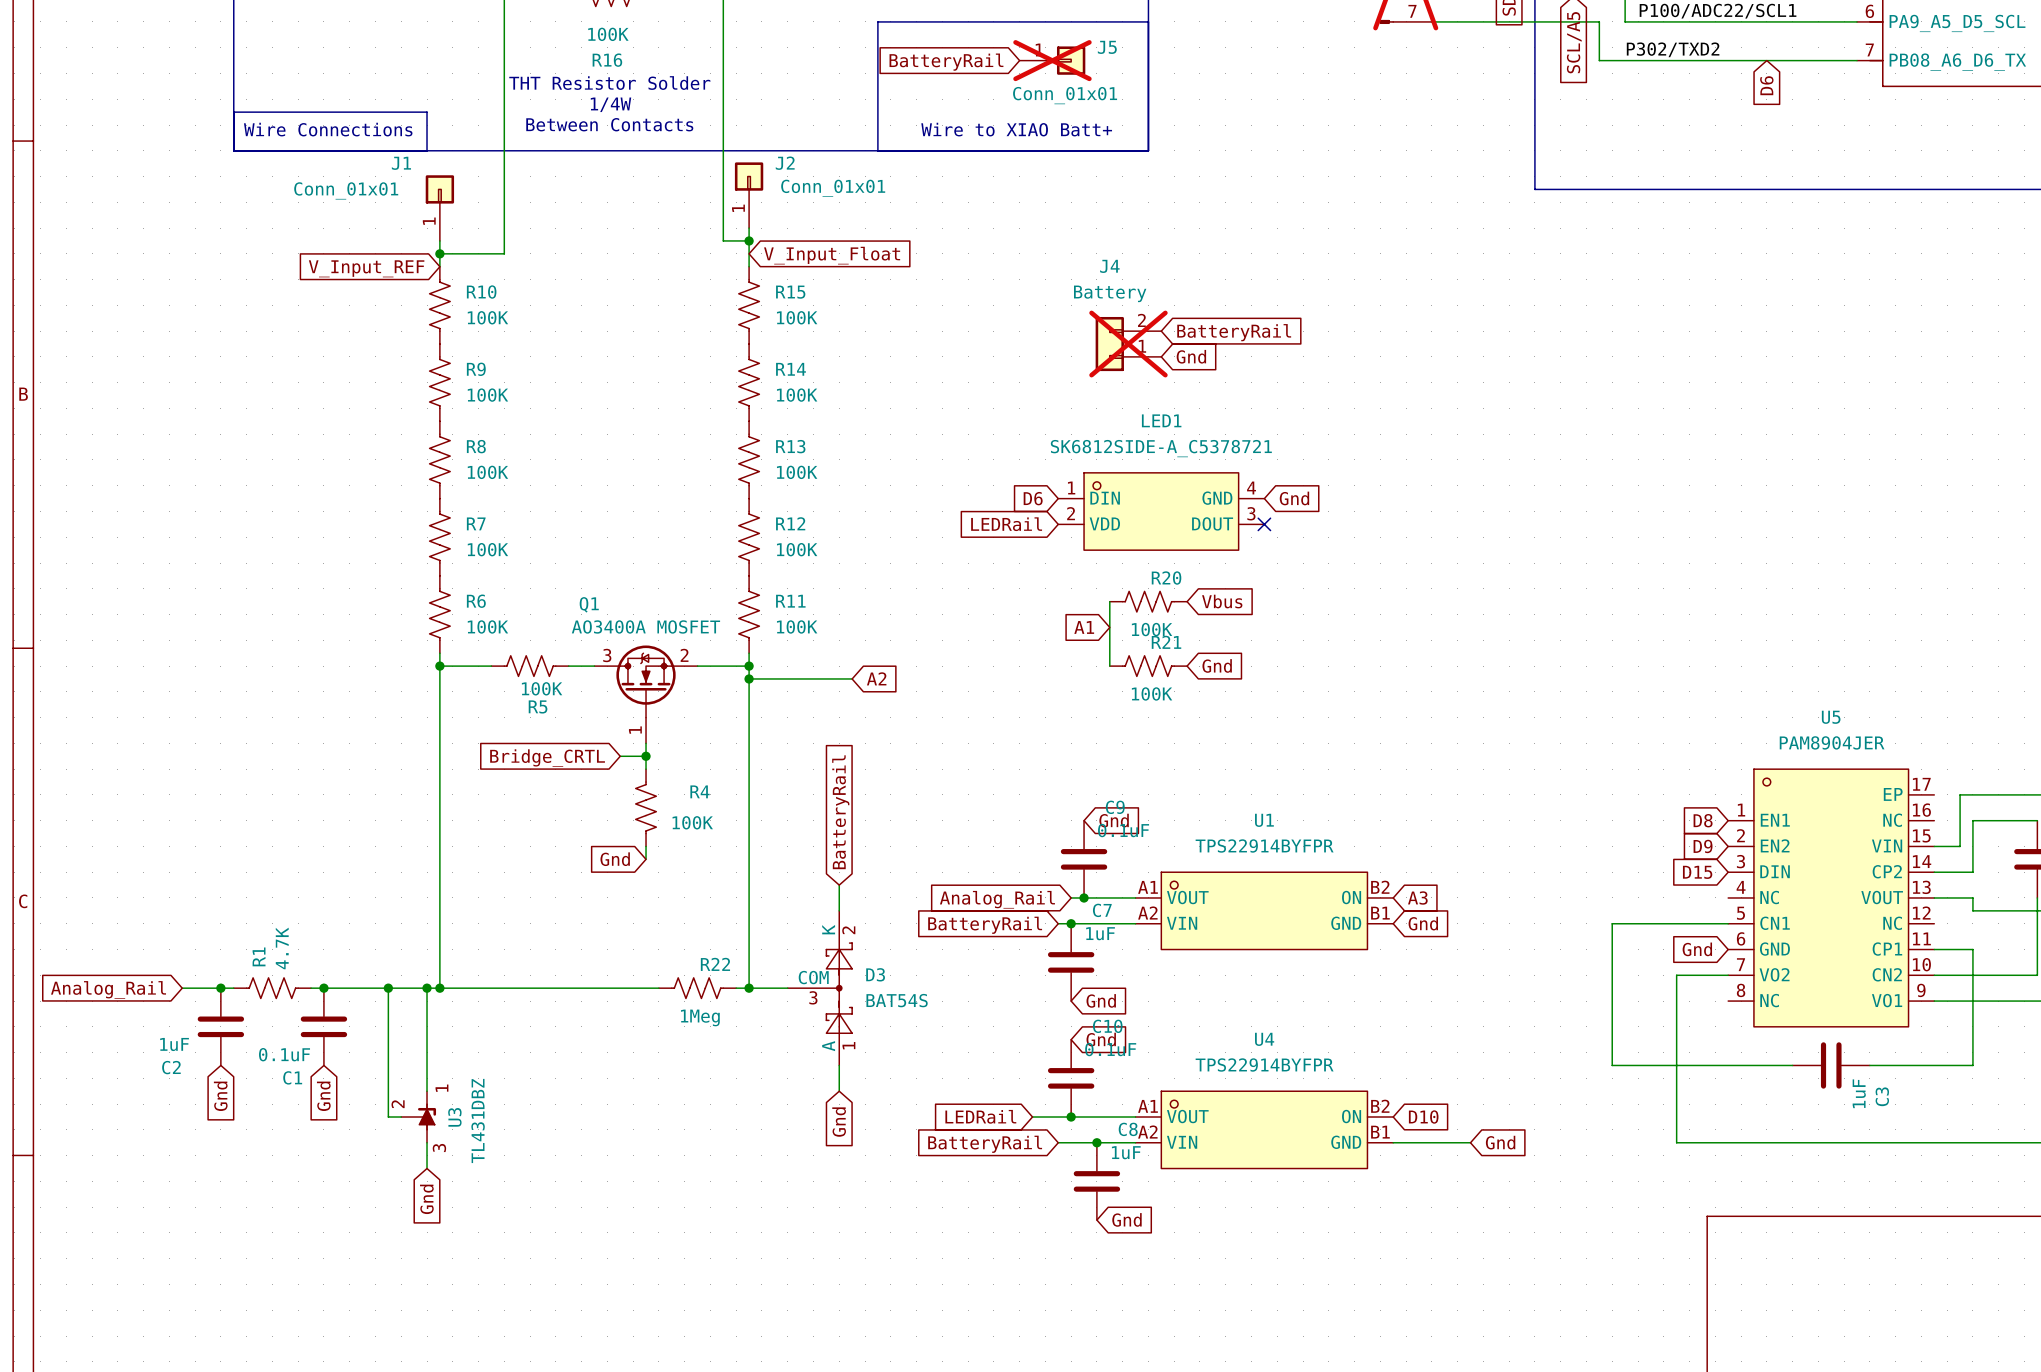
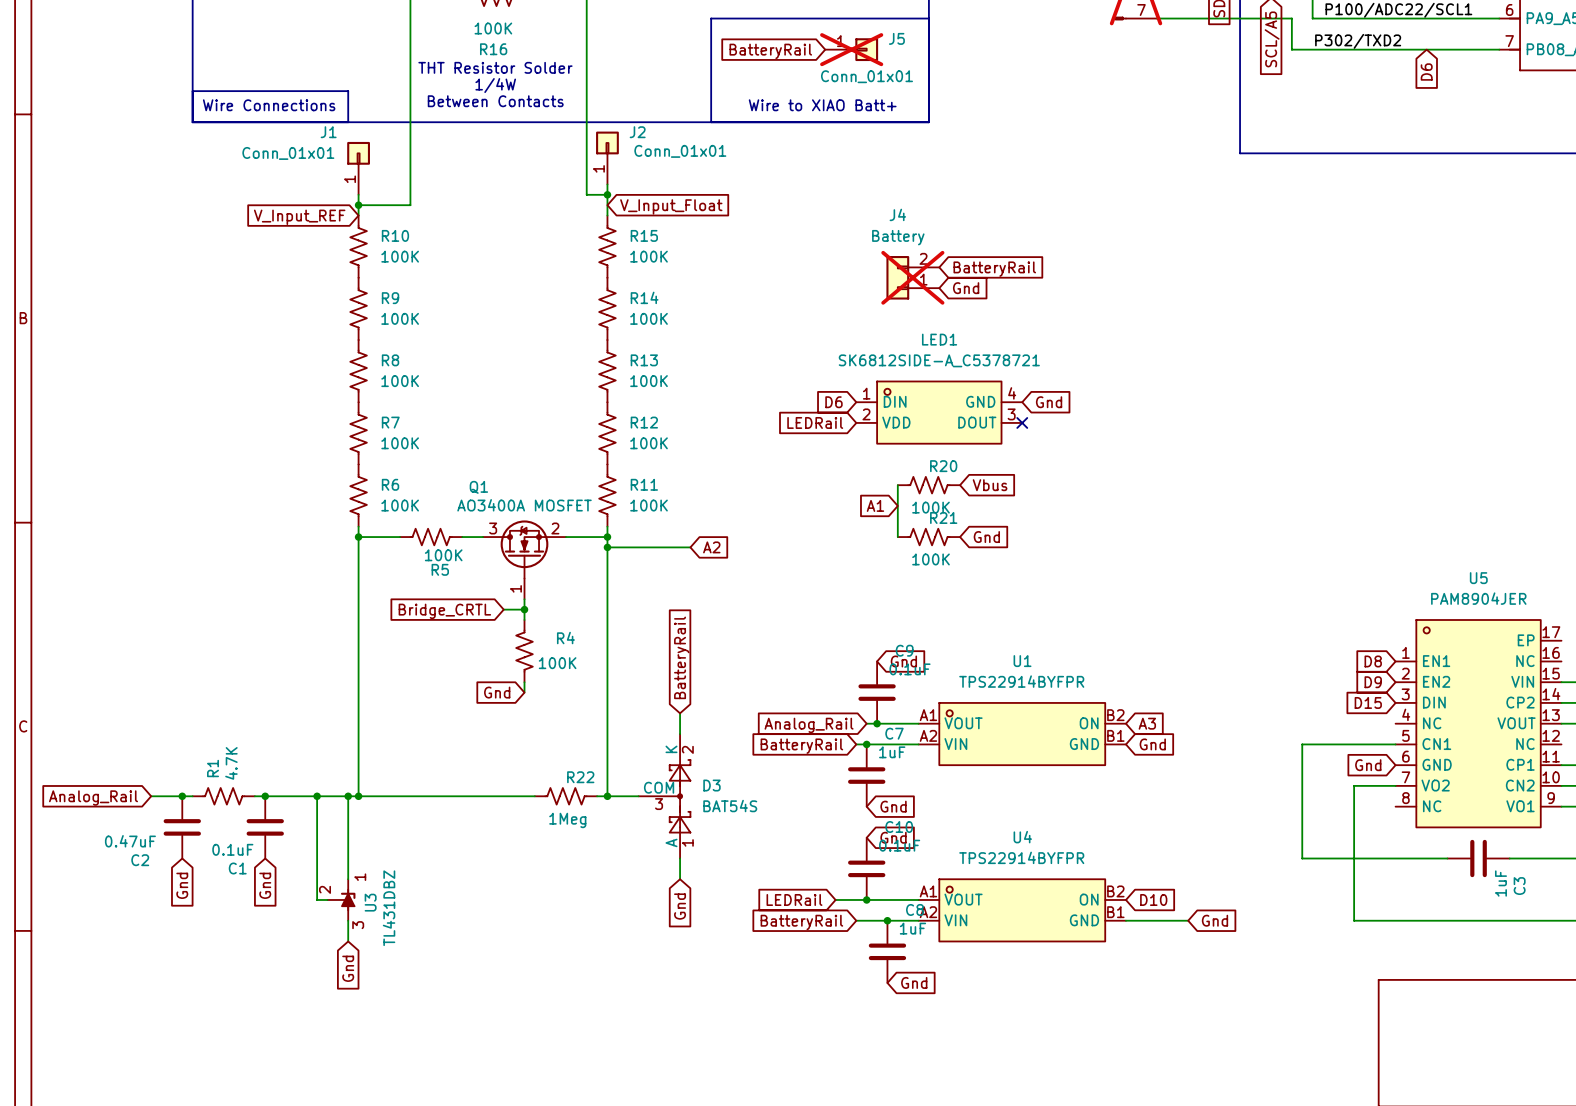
C2 value: 1uF (174, 1044) -> 0.47uF (130, 841)

